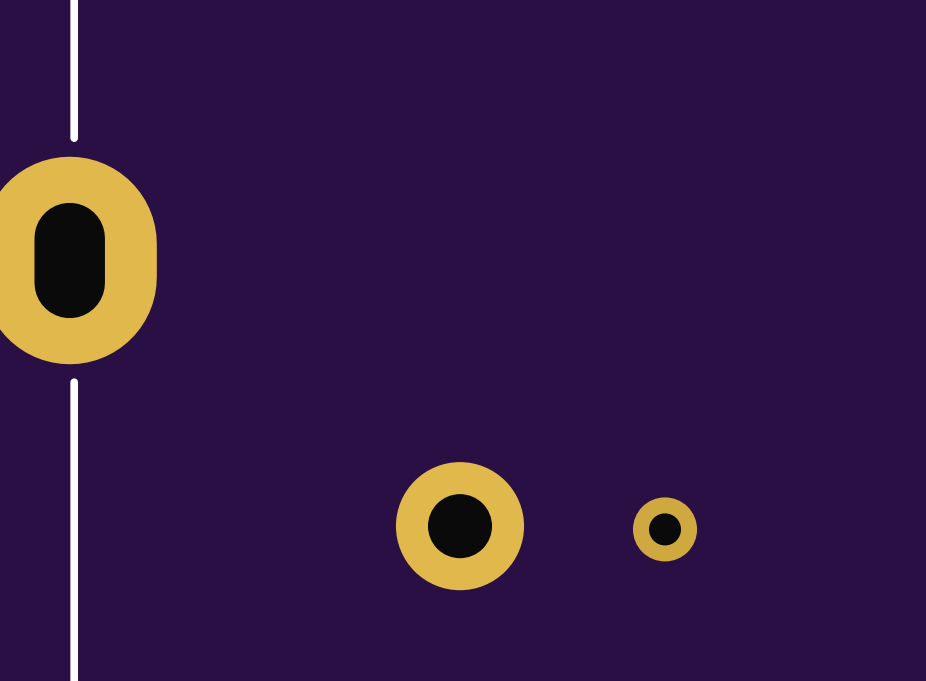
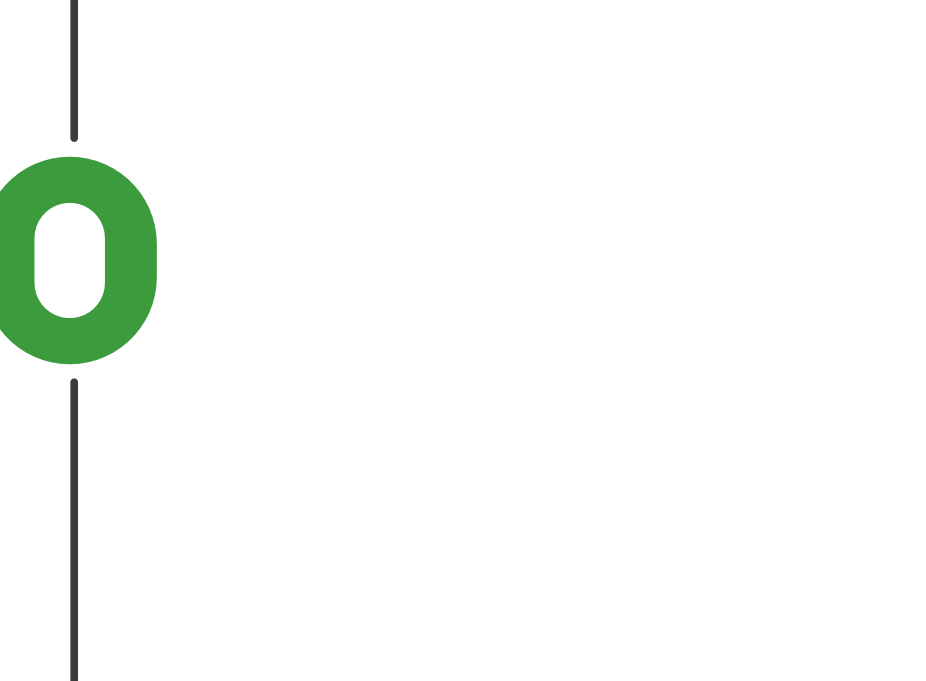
part: (459, 526) -> none
via: (665, 529) -> none

